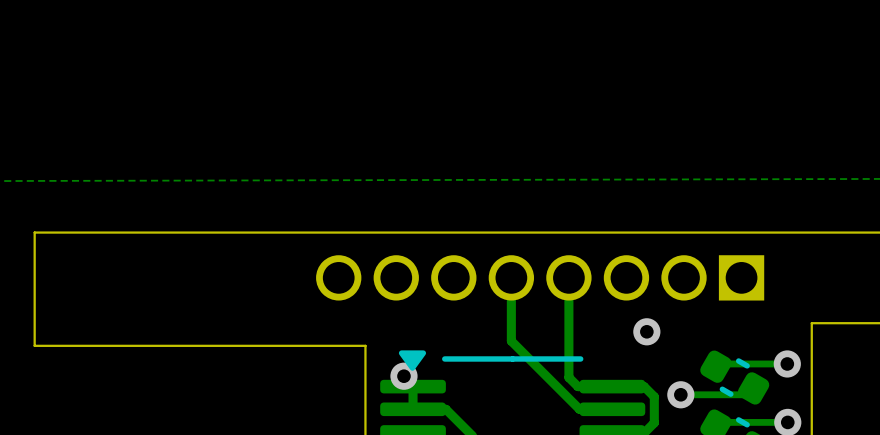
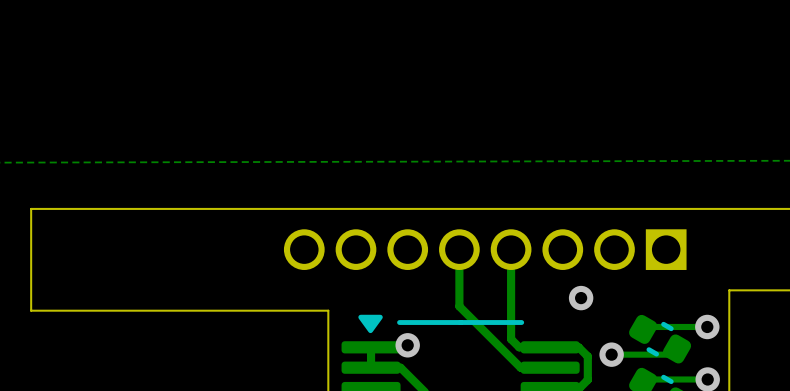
via position: (403, 376) -> (407, 345)

